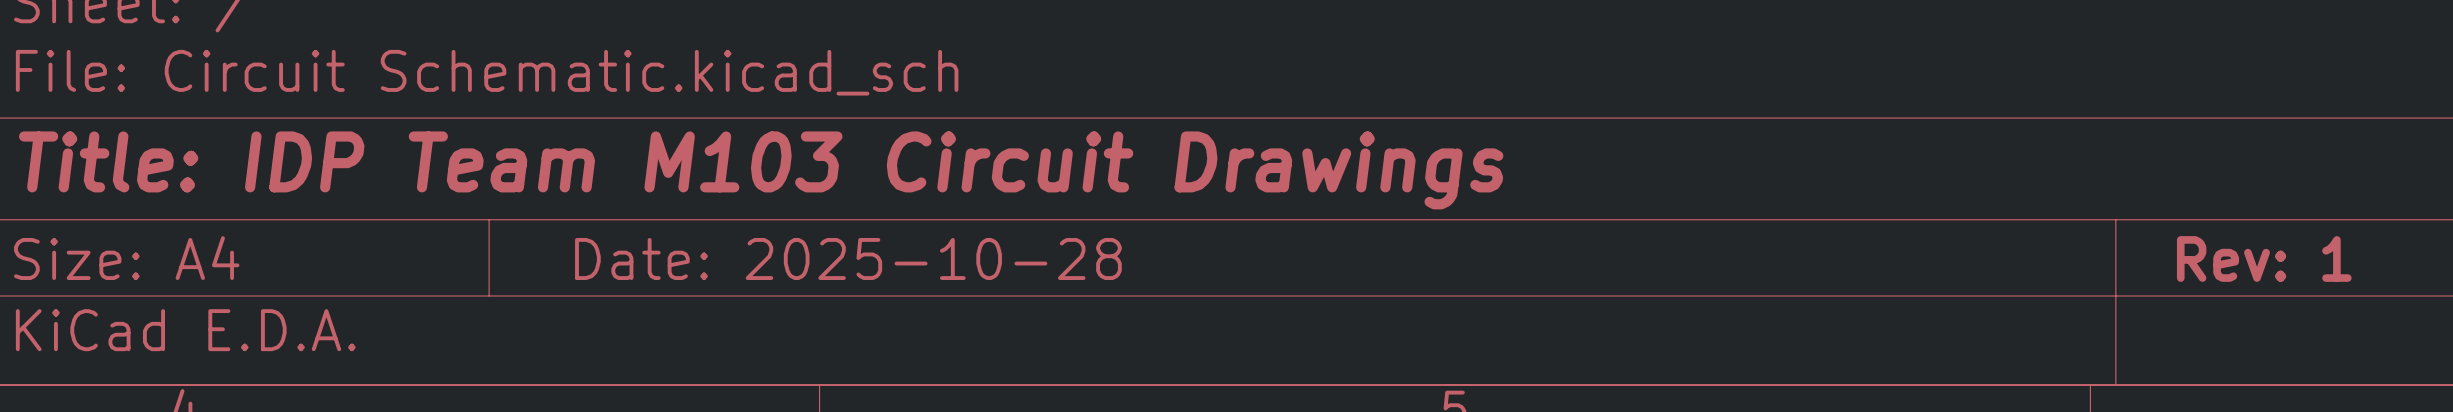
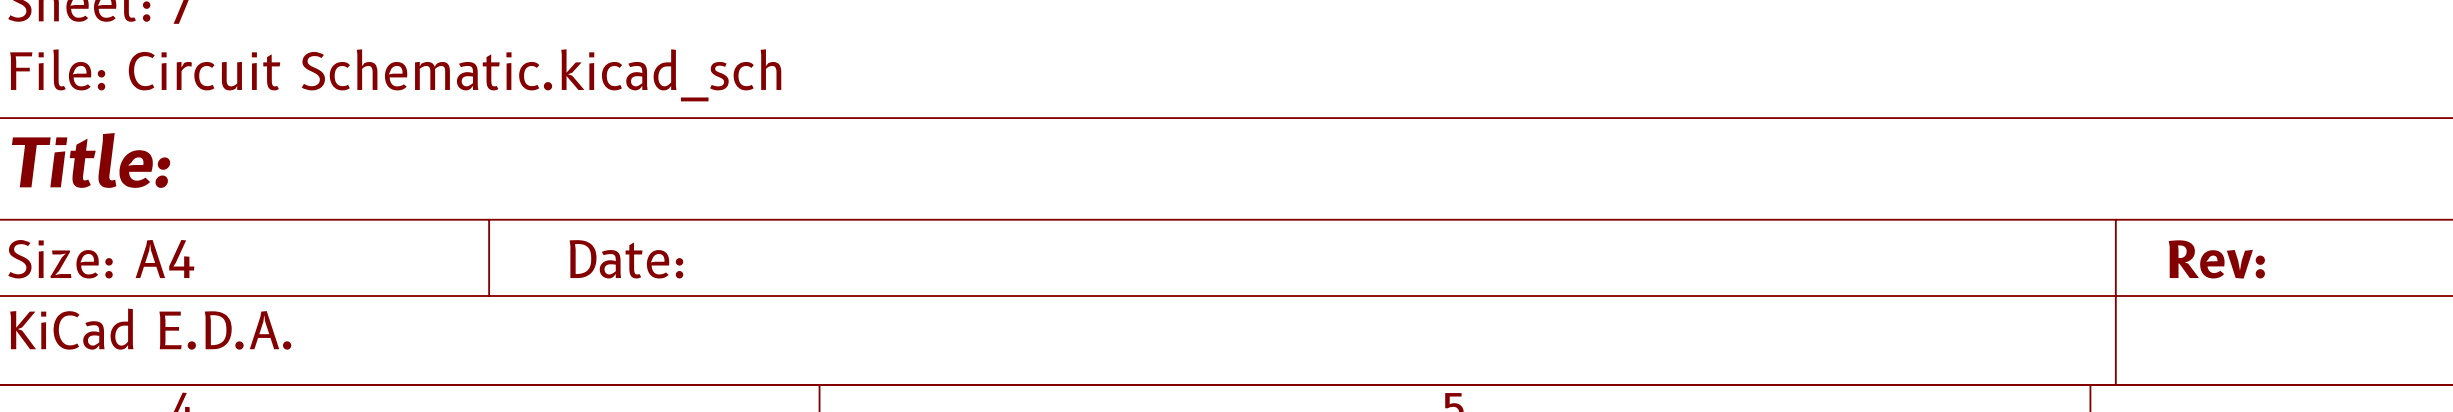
title block: Title: IDP Team M103 Circuit Drawings (761, 170) -> Title: (91, 160)
title block: Date: 2025-10-28 (848, 258) -> Date: (626, 259)
title block: Rev: 1 (2264, 258) -> Rev: (2216, 259)

